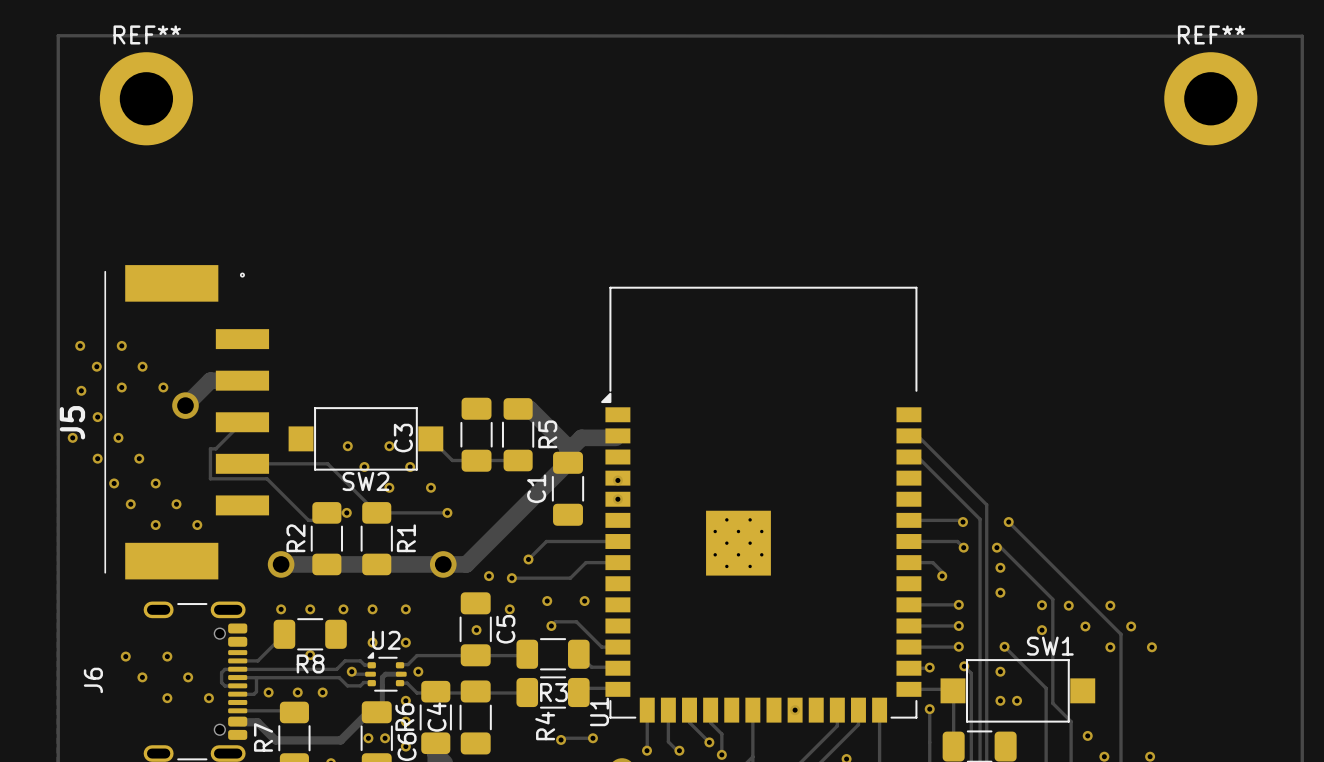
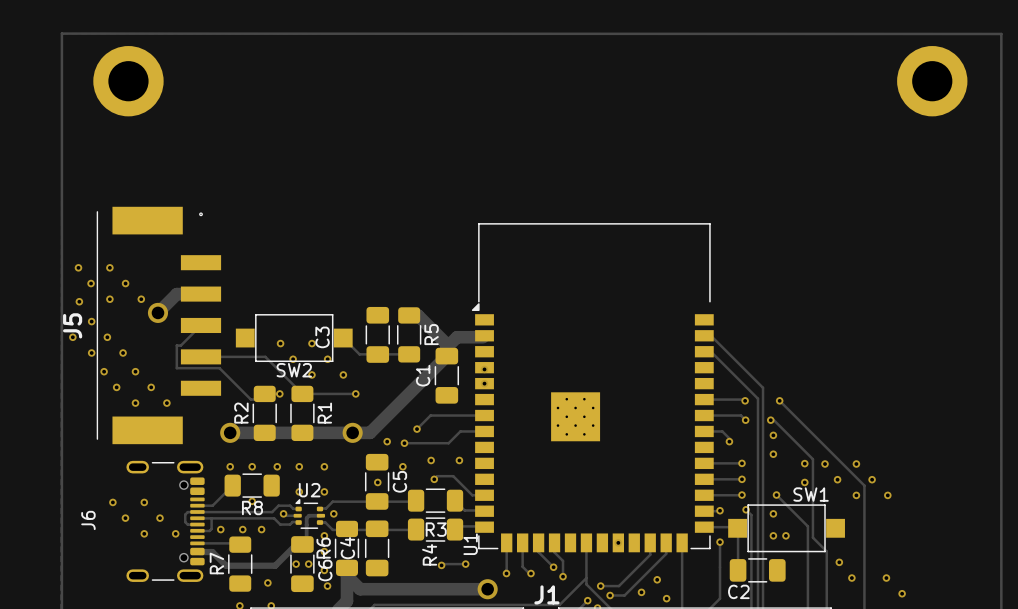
REF** name: REF** (147, 34) -> none
REF** name: REF** (1211, 34) -> none

